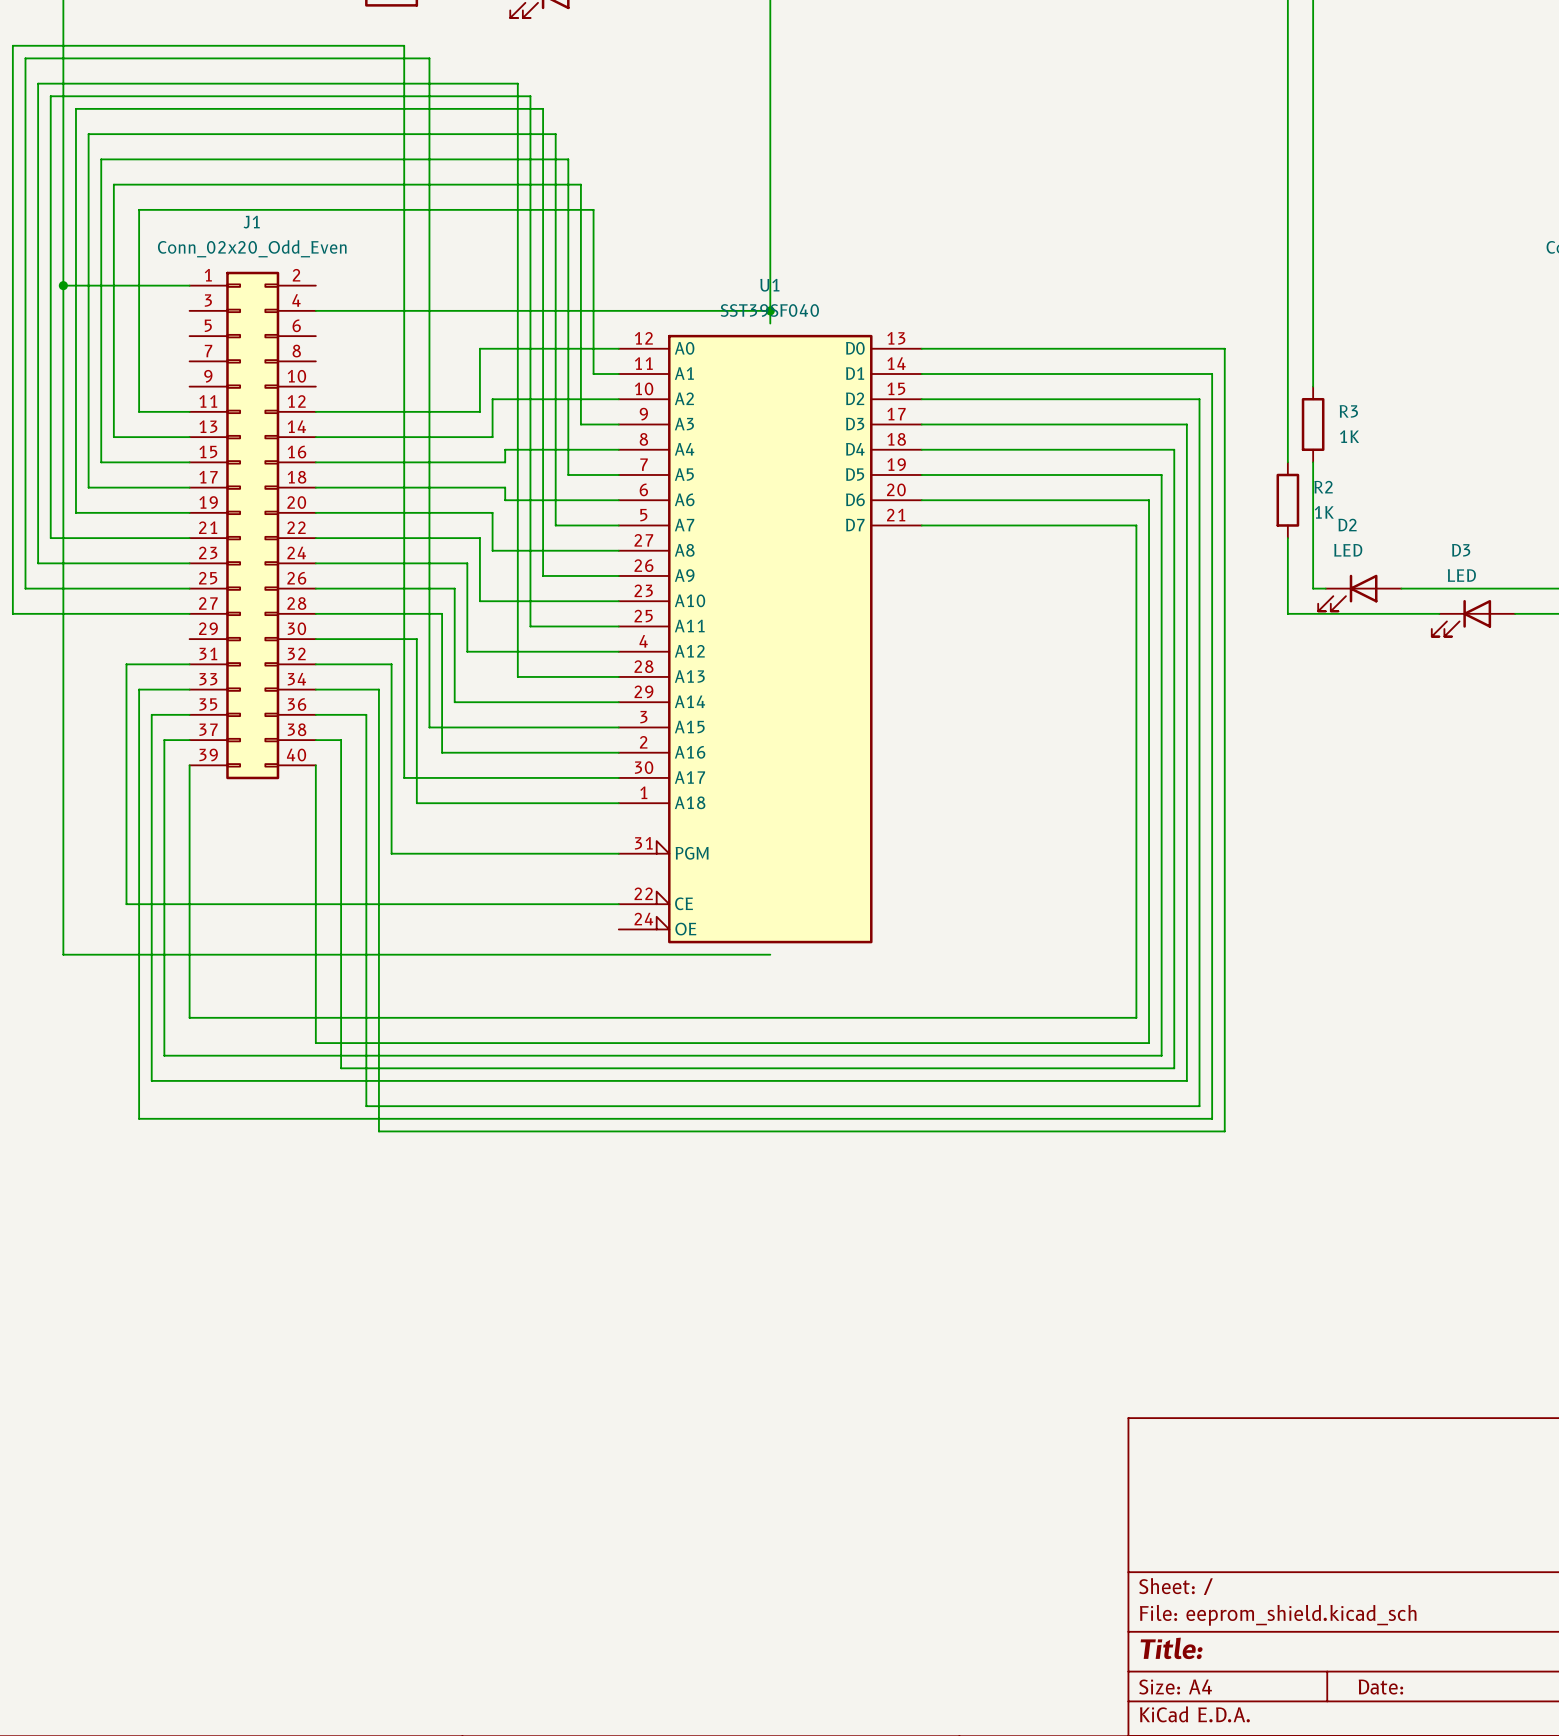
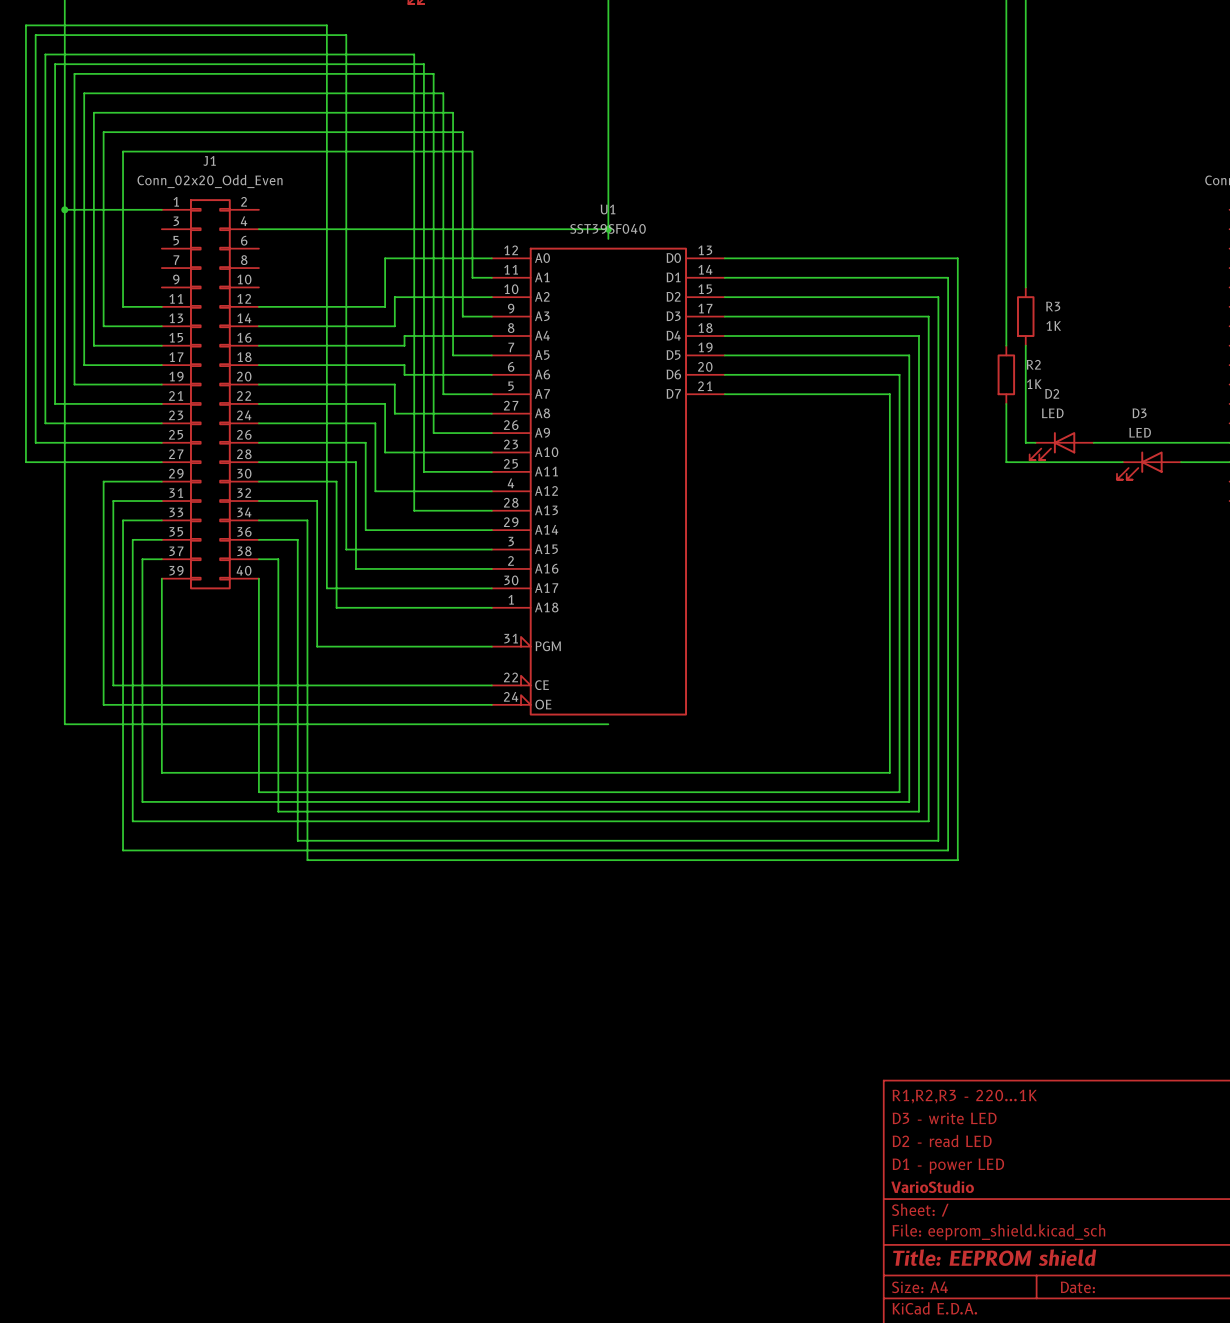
wire: none -> (161, 481) (103, 481) (103, 704) (491, 704)
title block: none -> R1,R2,R3 - 220...1K (964, 1096)
title block: none -> D3 - write LED (944, 1118)
title block: none -> D2 - read LED (942, 1140)
title block: none -> D1 - power LED (948, 1166)
title block: none -> VarioStudio (932, 1186)
title block: Title: (1171, 1648) -> Title: EEPROM shield (994, 1257)

